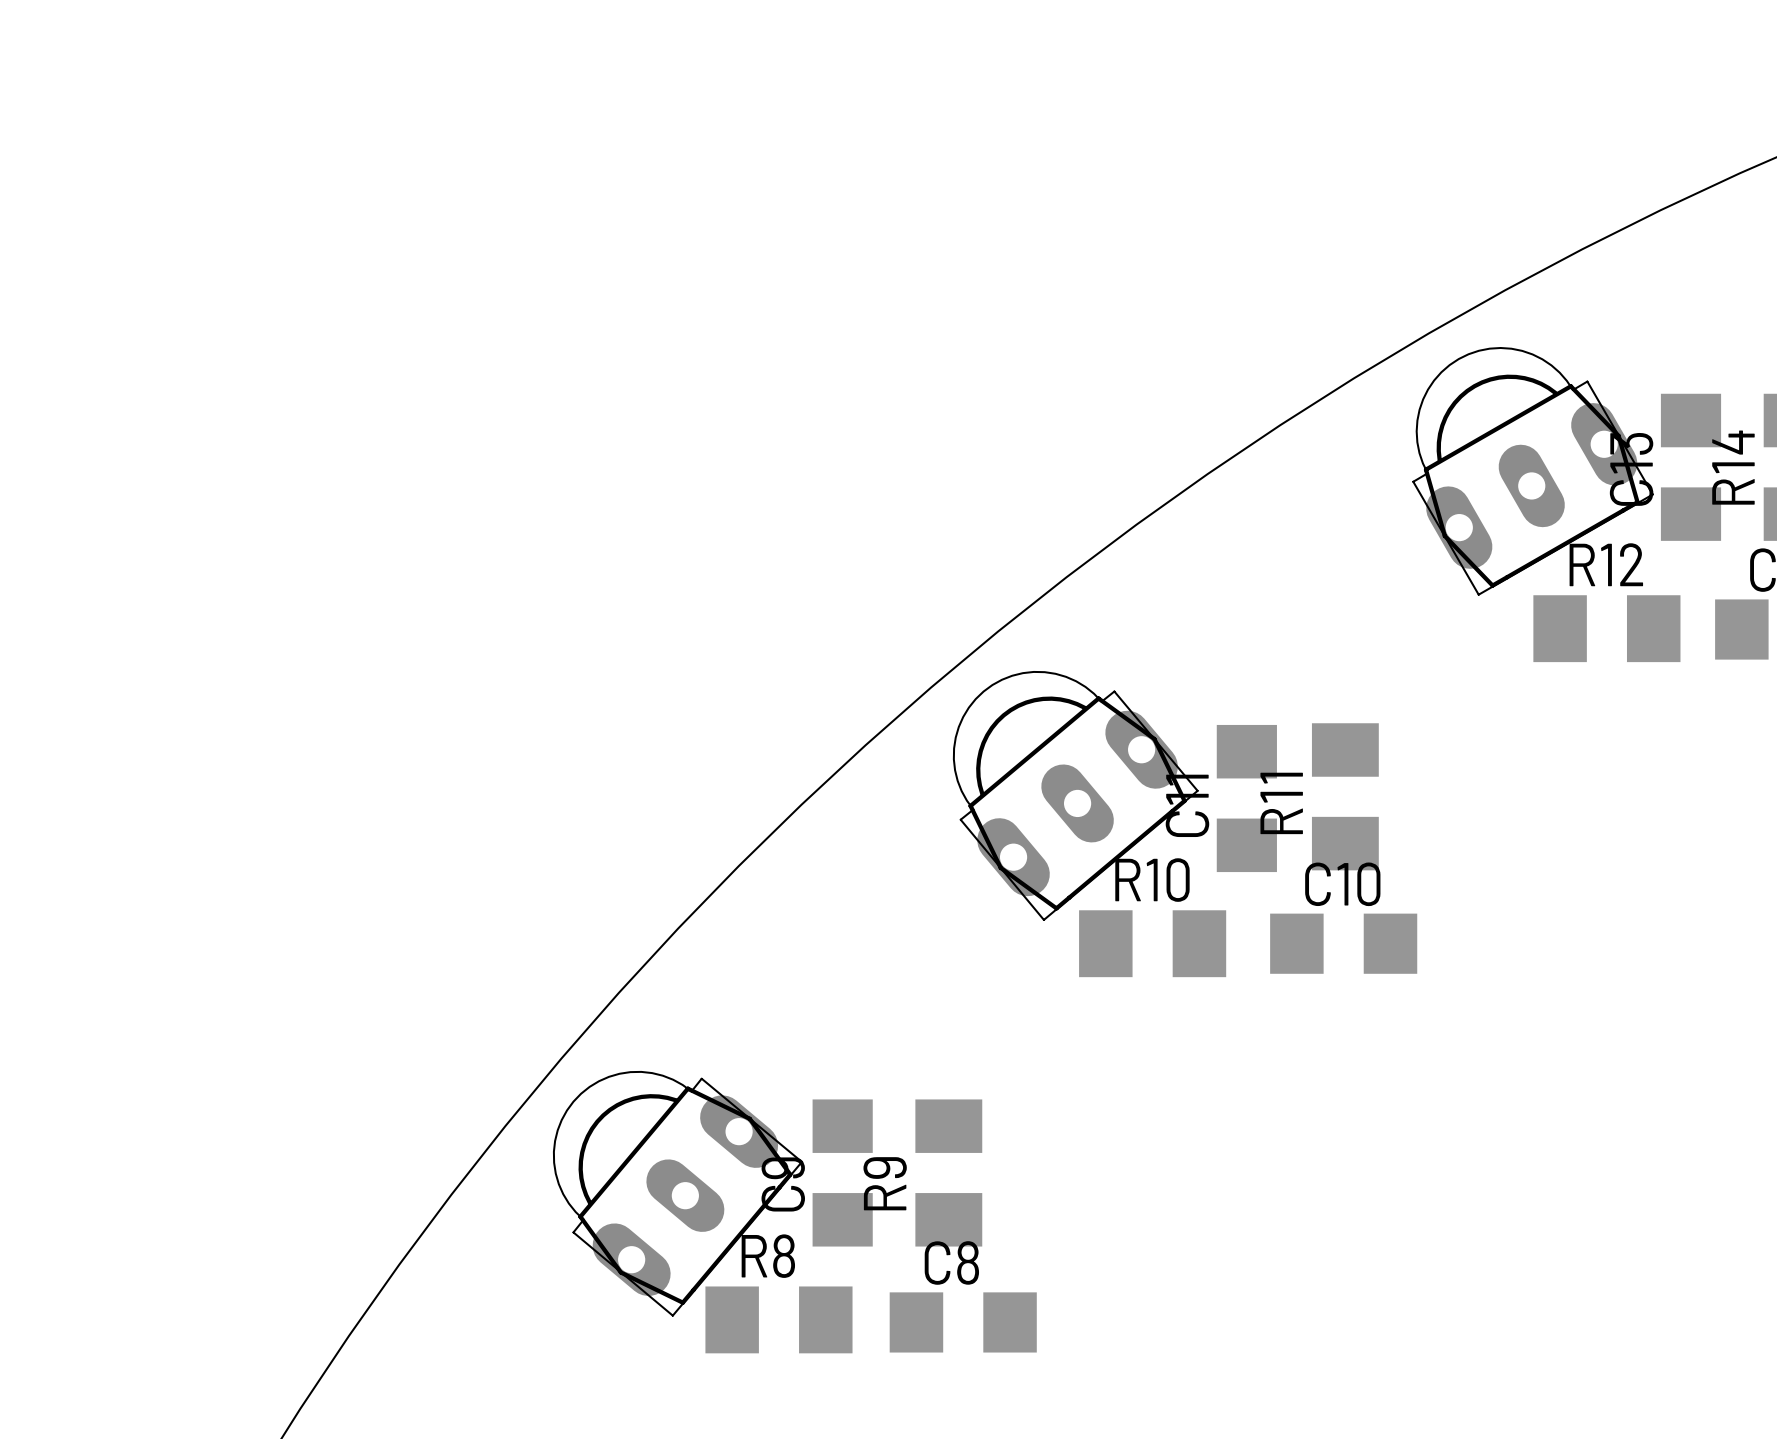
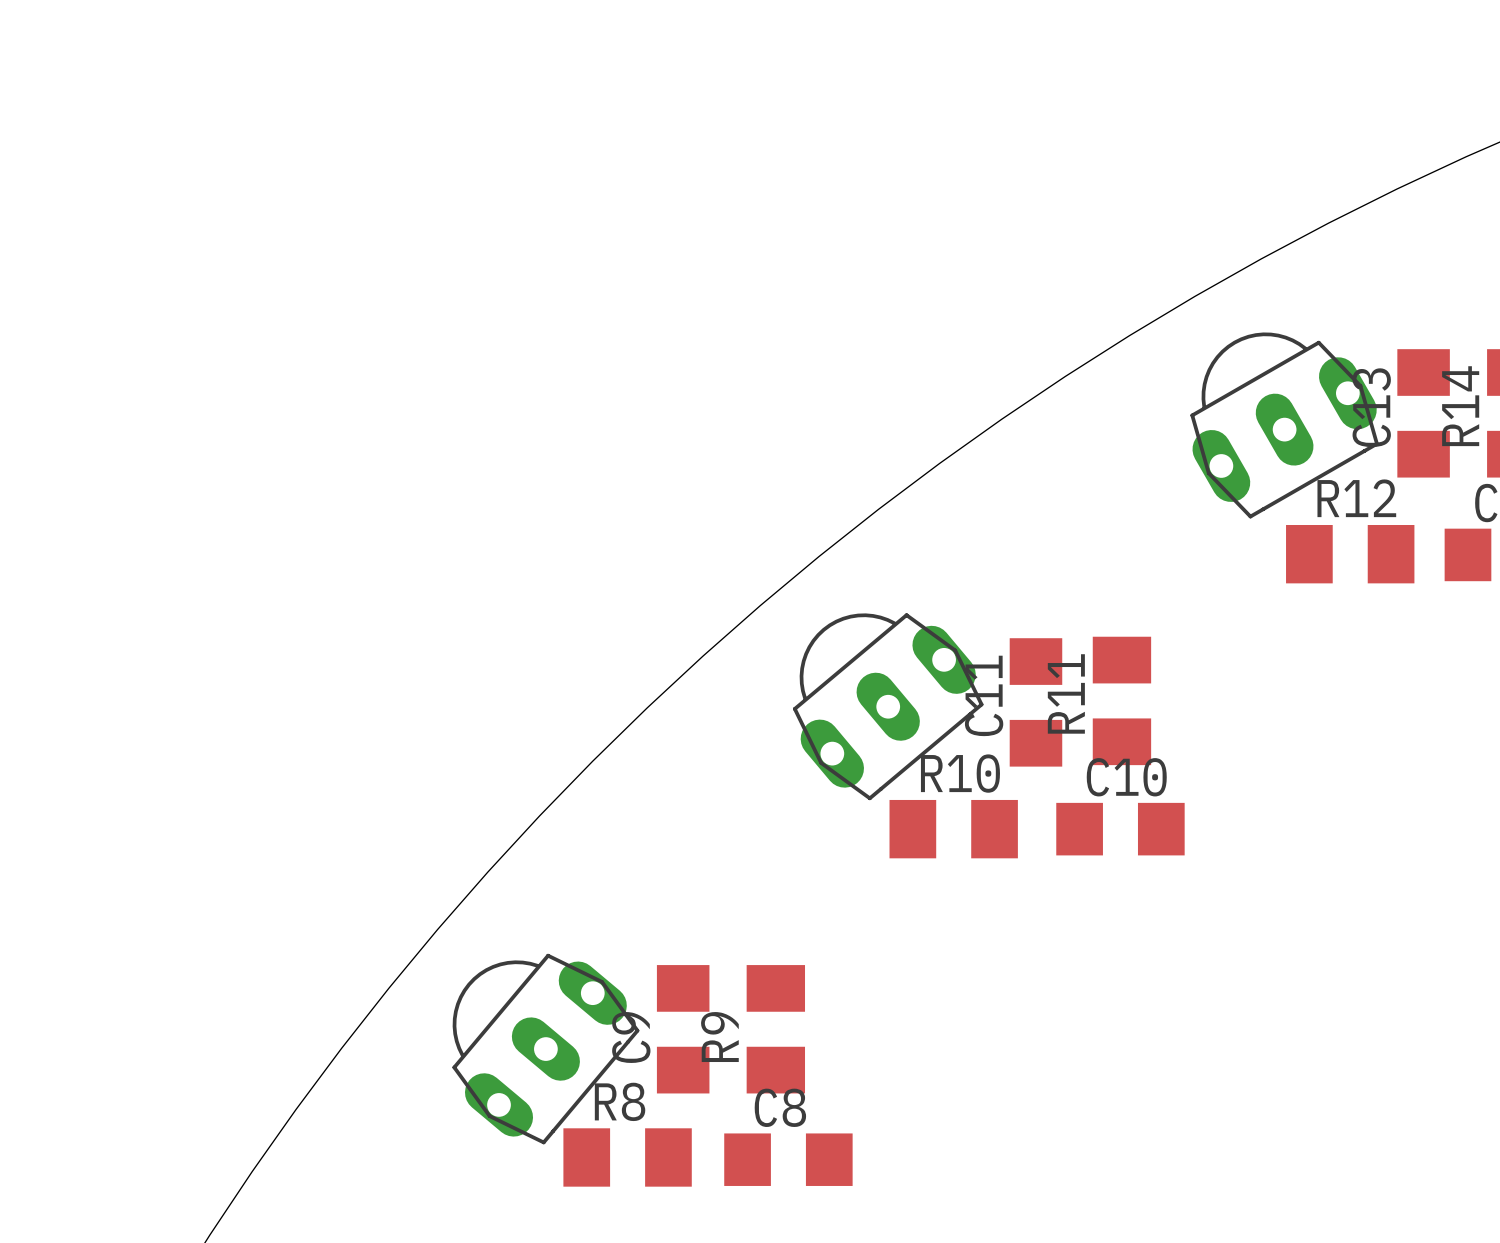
board edge: (1587, 381) (1572, 390) (1559, 372) (1542, 359) (1522, 350) (1500, 347) (1478, 350) (1458, 359) (1441, 372) (1428, 389) (1419, 409) (1416, 431) (1419, 453) (1427, 473) (1413, 481) (1478, 594) (1652, 494) (1587, 381) -> none
board edge: (1114, 691) (1101, 701) (1085, 686) (1066, 676) (1044, 672) (1022, 673) (1002, 679) (983, 691) (968, 707) (958, 727) (954, 748) (955, 770) (961, 791) (973, 809) (960, 819) (1043, 919) (1197, 790) (1114, 691) -> none
board edge: (701, 1078) (691, 1091) (673, 1079) (652, 1073) (630, 1072) (609, 1076) (589, 1086) (573, 1101) (561, 1120) (555, 1140) (554, 1162) (558, 1184) (568, 1203) (583, 1219) (573, 1232) (672, 1315) (801, 1161) (701, 1078) -> none

